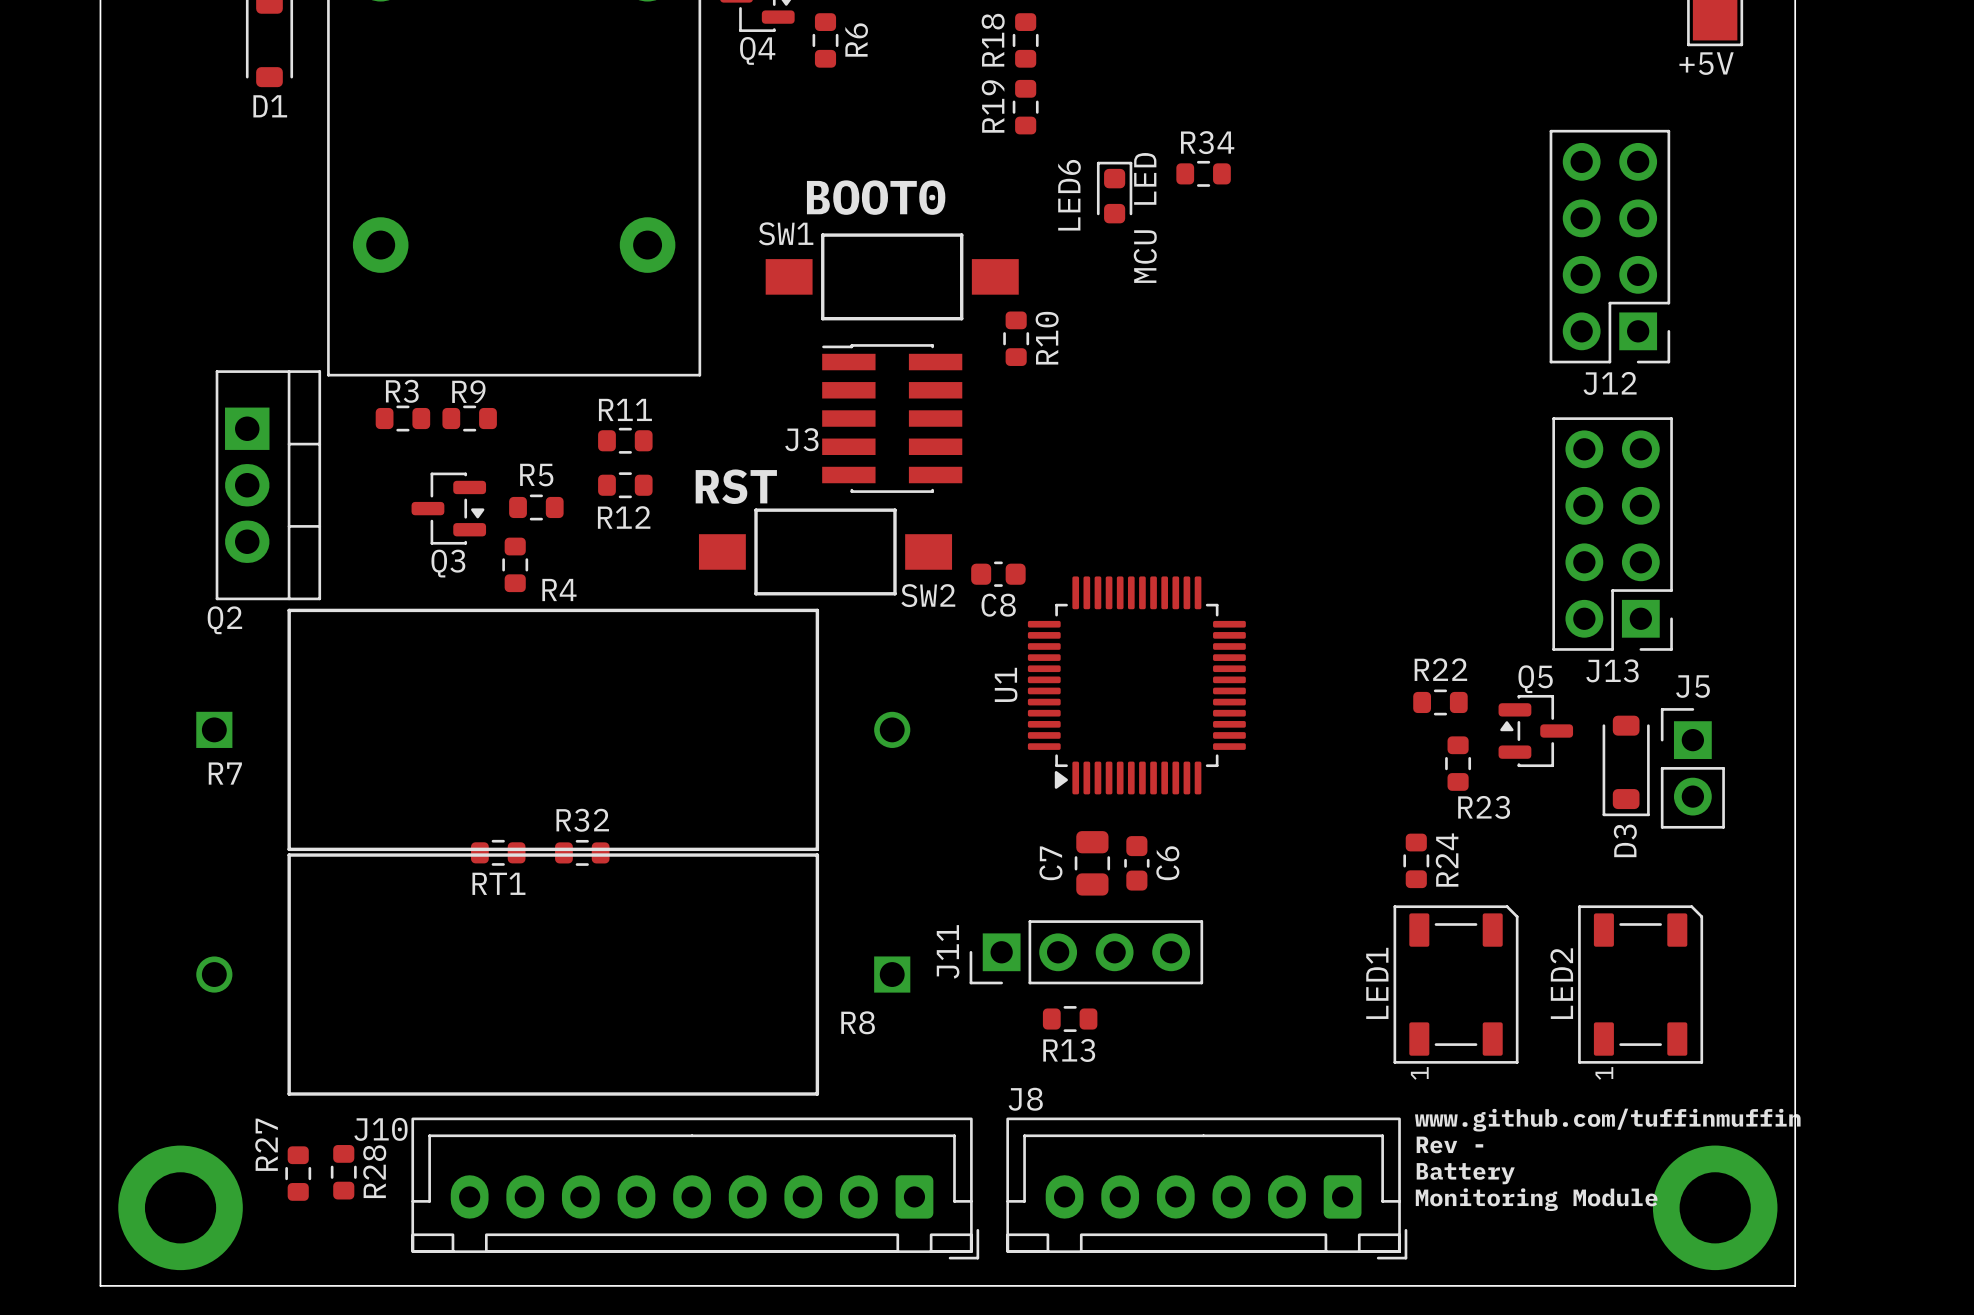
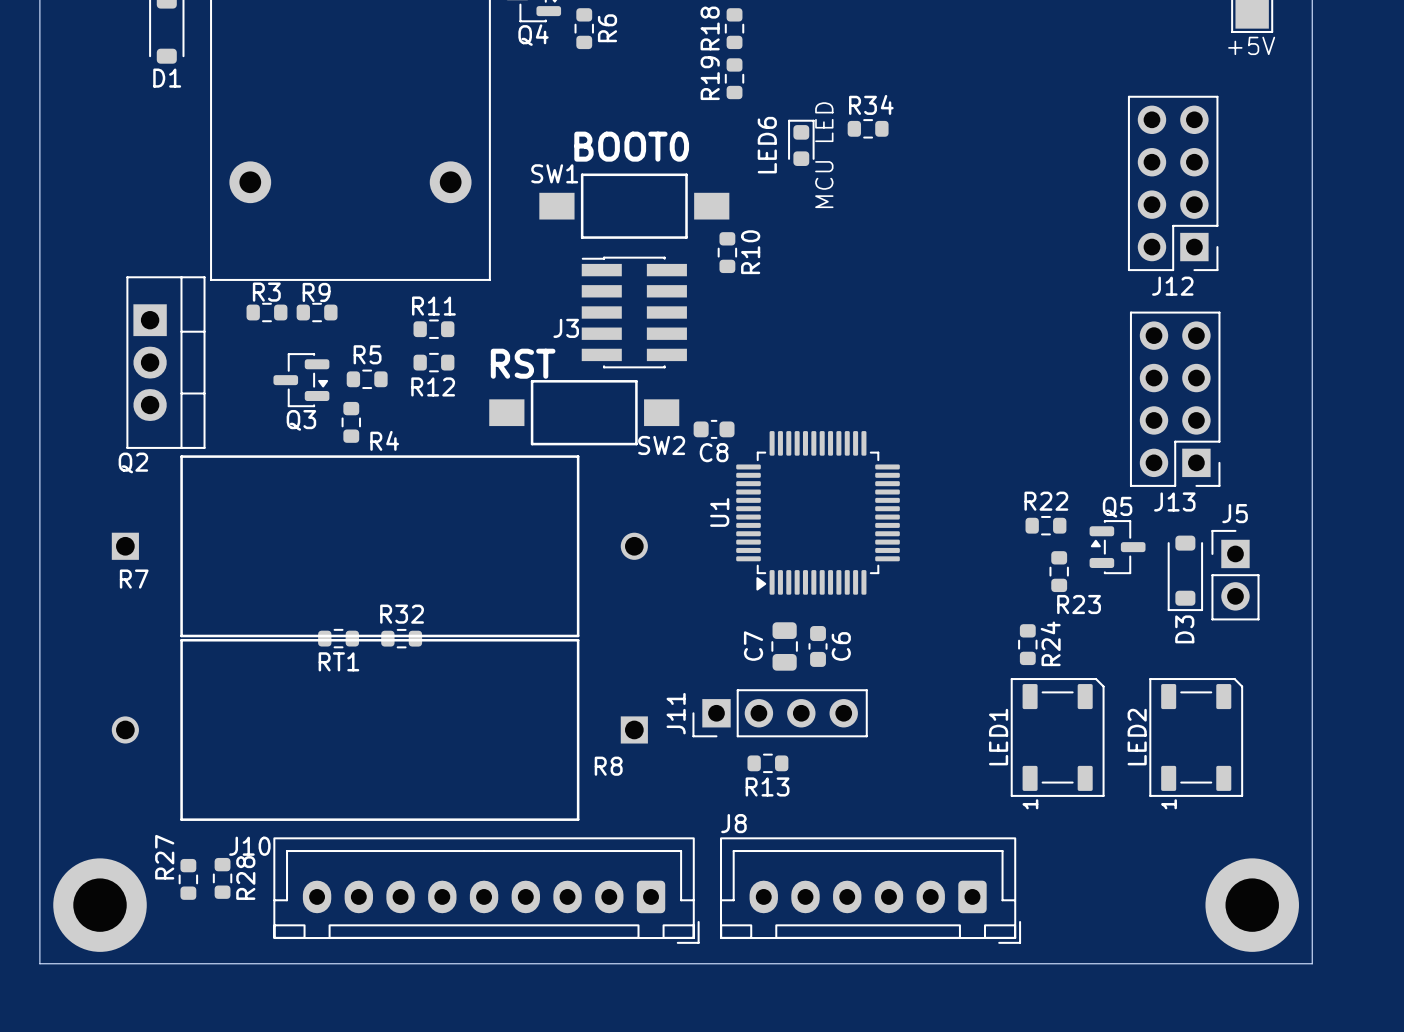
text: www.github.com/tuffinmuffin (1607, 1120) -> none
text: Rev - (1449, 1144) -> none
text: Battery (1465, 1173) -> none
text: Monitoring Module (1536, 1199) -> none

